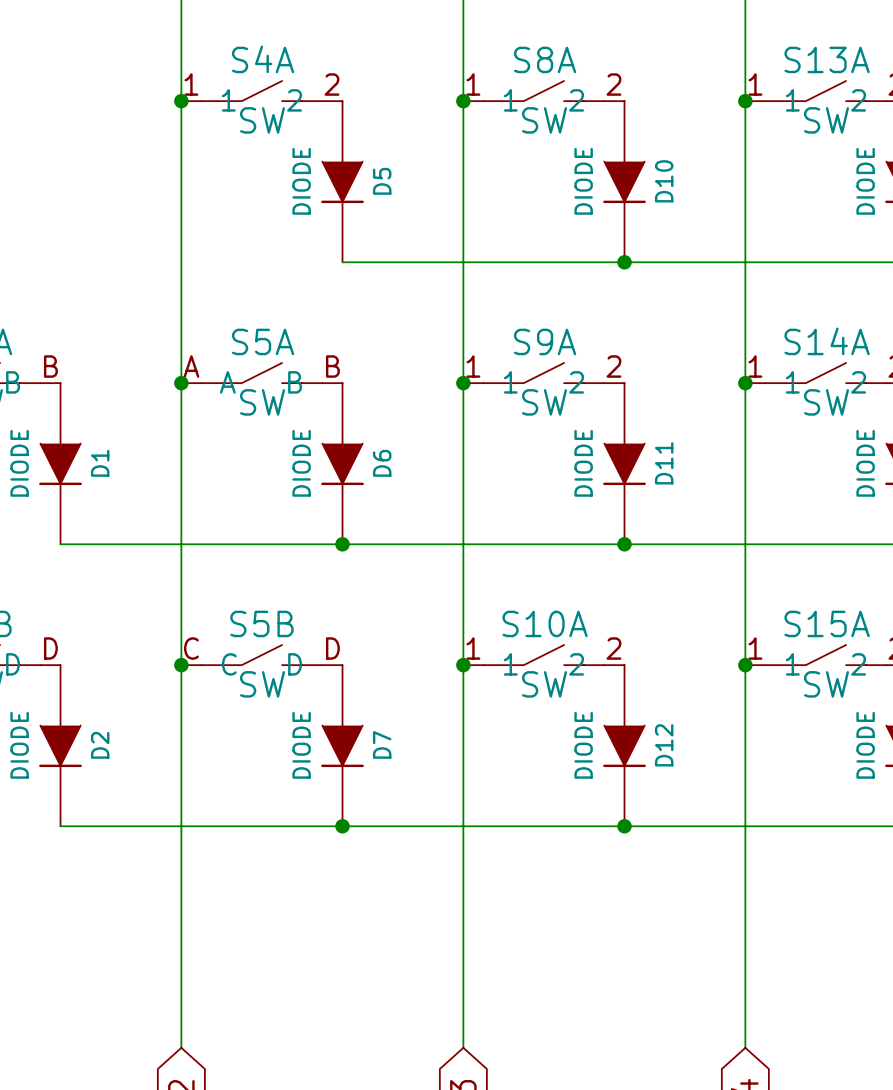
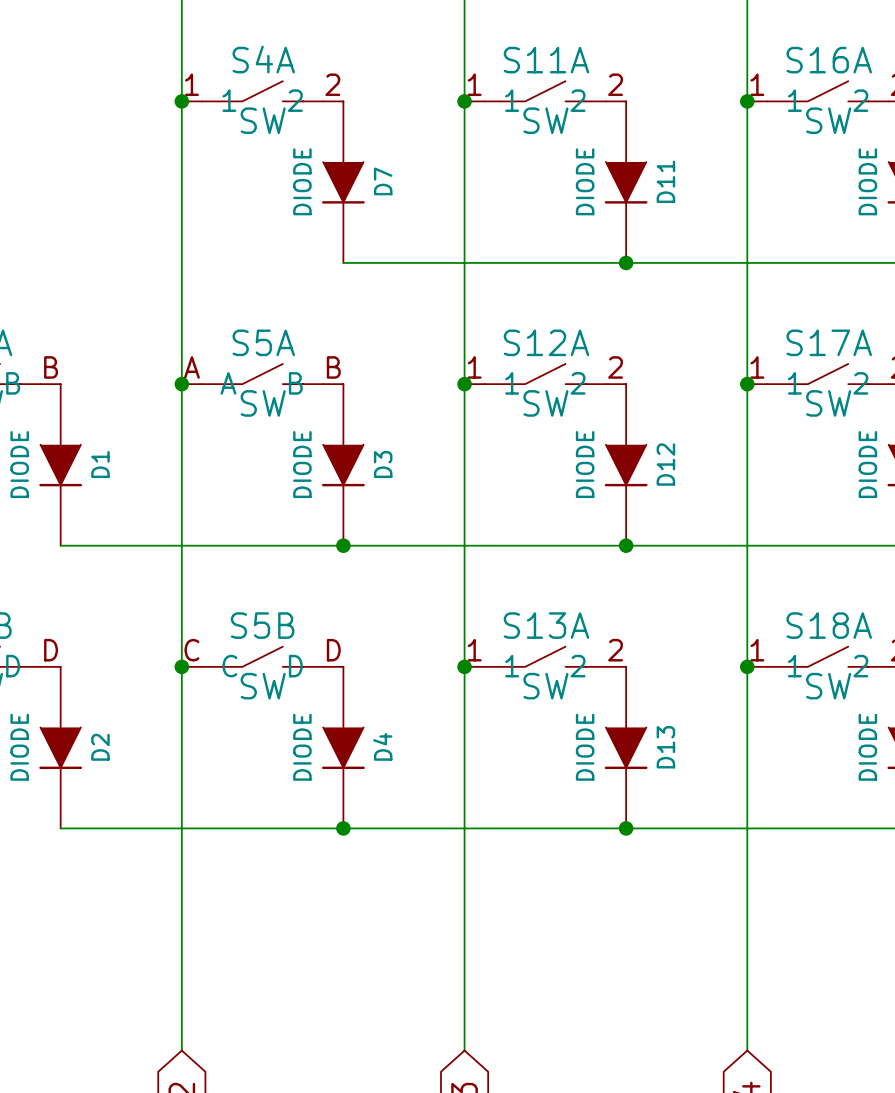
S8A name: S8A (545, 59) -> S11A (546, 60)
S13A name: S13A (827, 59) -> S16A (829, 60)
D5 name: D5 (382, 181) -> D7 (383, 181)
D10 name: D10 (664, 181) -> D11 (665, 181)
S9A name: S9A (545, 341) -> S12A (546, 342)
S14A name: S14A (827, 341) -> S17A (829, 342)
D6 name: D6 (382, 463) -> D3 (383, 464)
D11 name: D11 (664, 463) -> D12 (665, 464)
S10A name: S10A (545, 623) -> S13A (546, 625)
S15A name: S15A (827, 623) -> S18A (829, 625)
D7 name: D7 (382, 744) -> D4 (382, 746)
D12 name: D12 (664, 745) -> D13 (665, 747)

